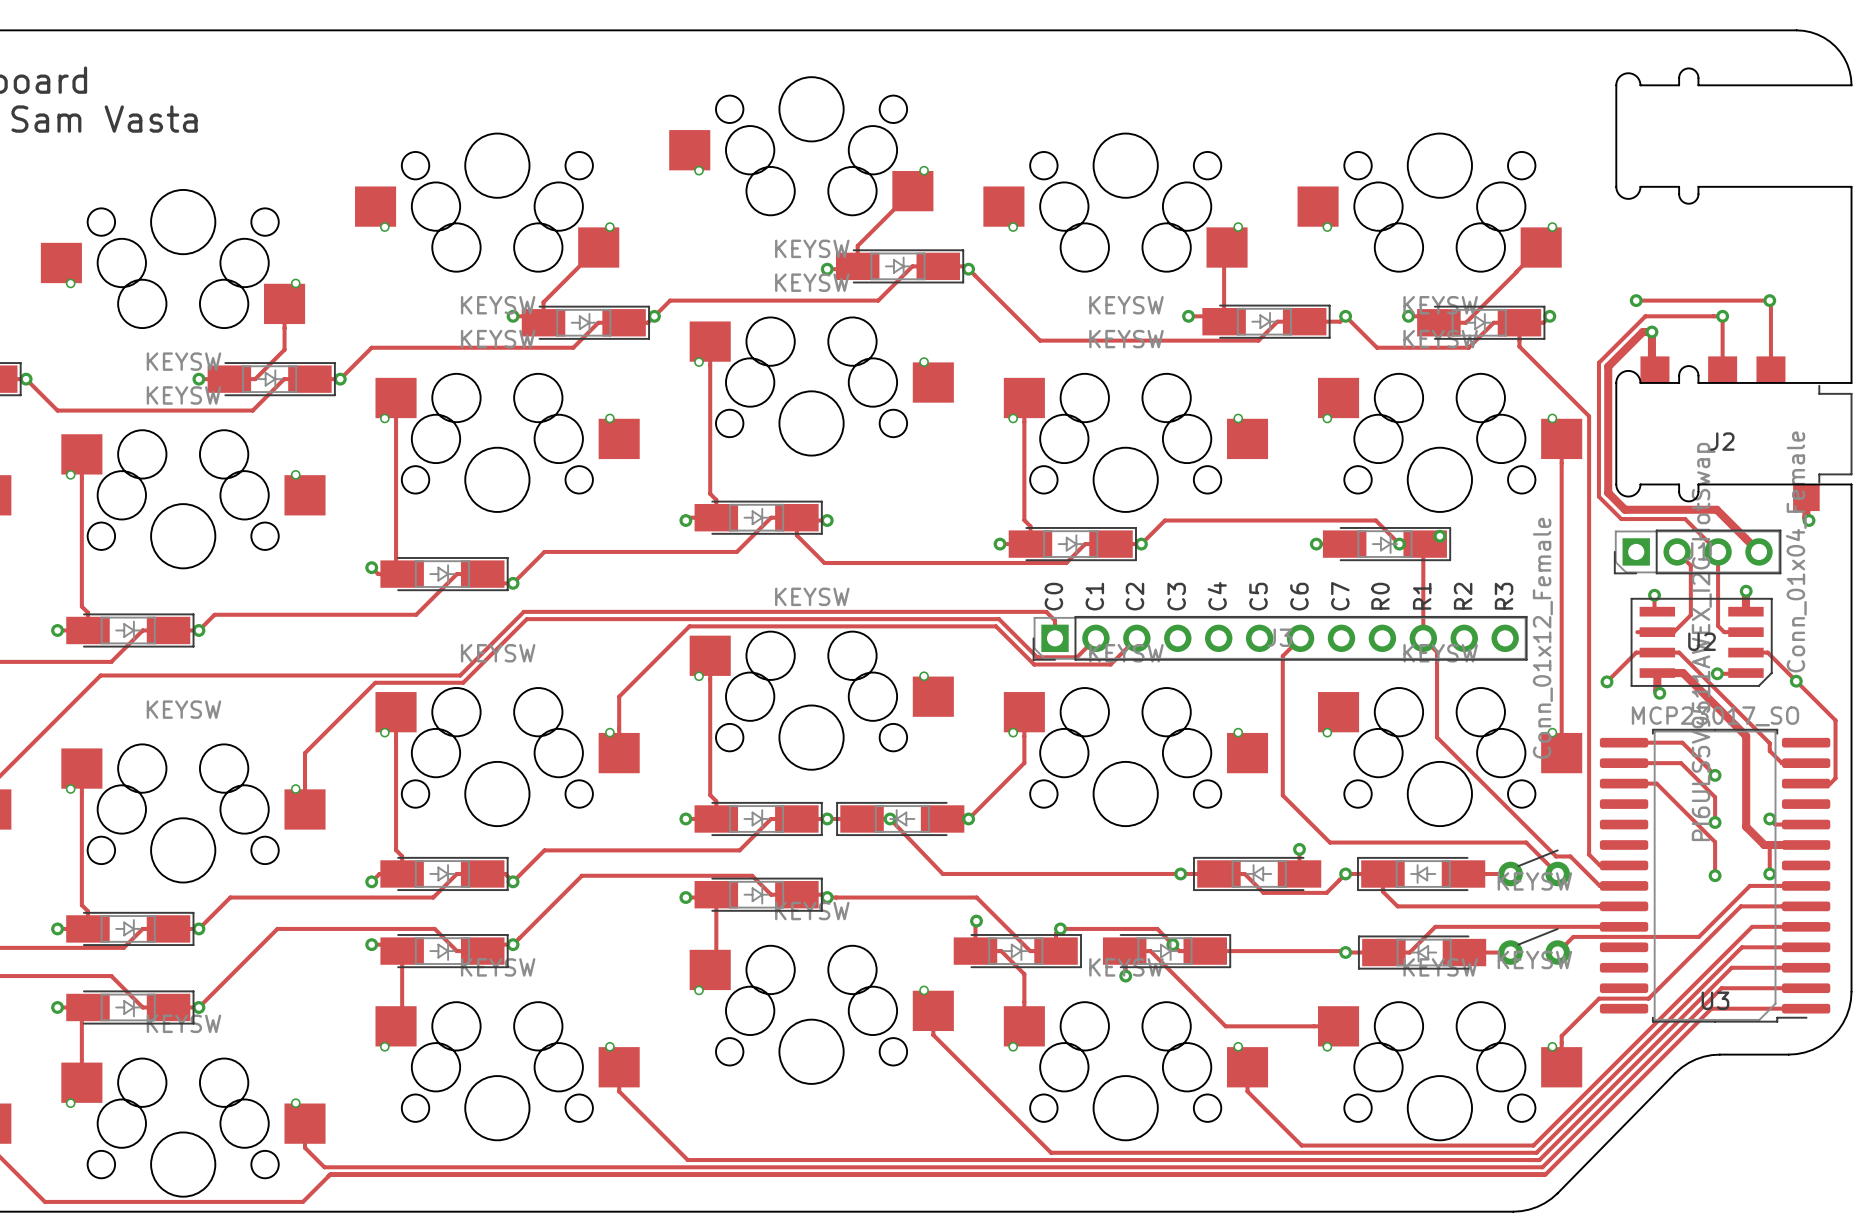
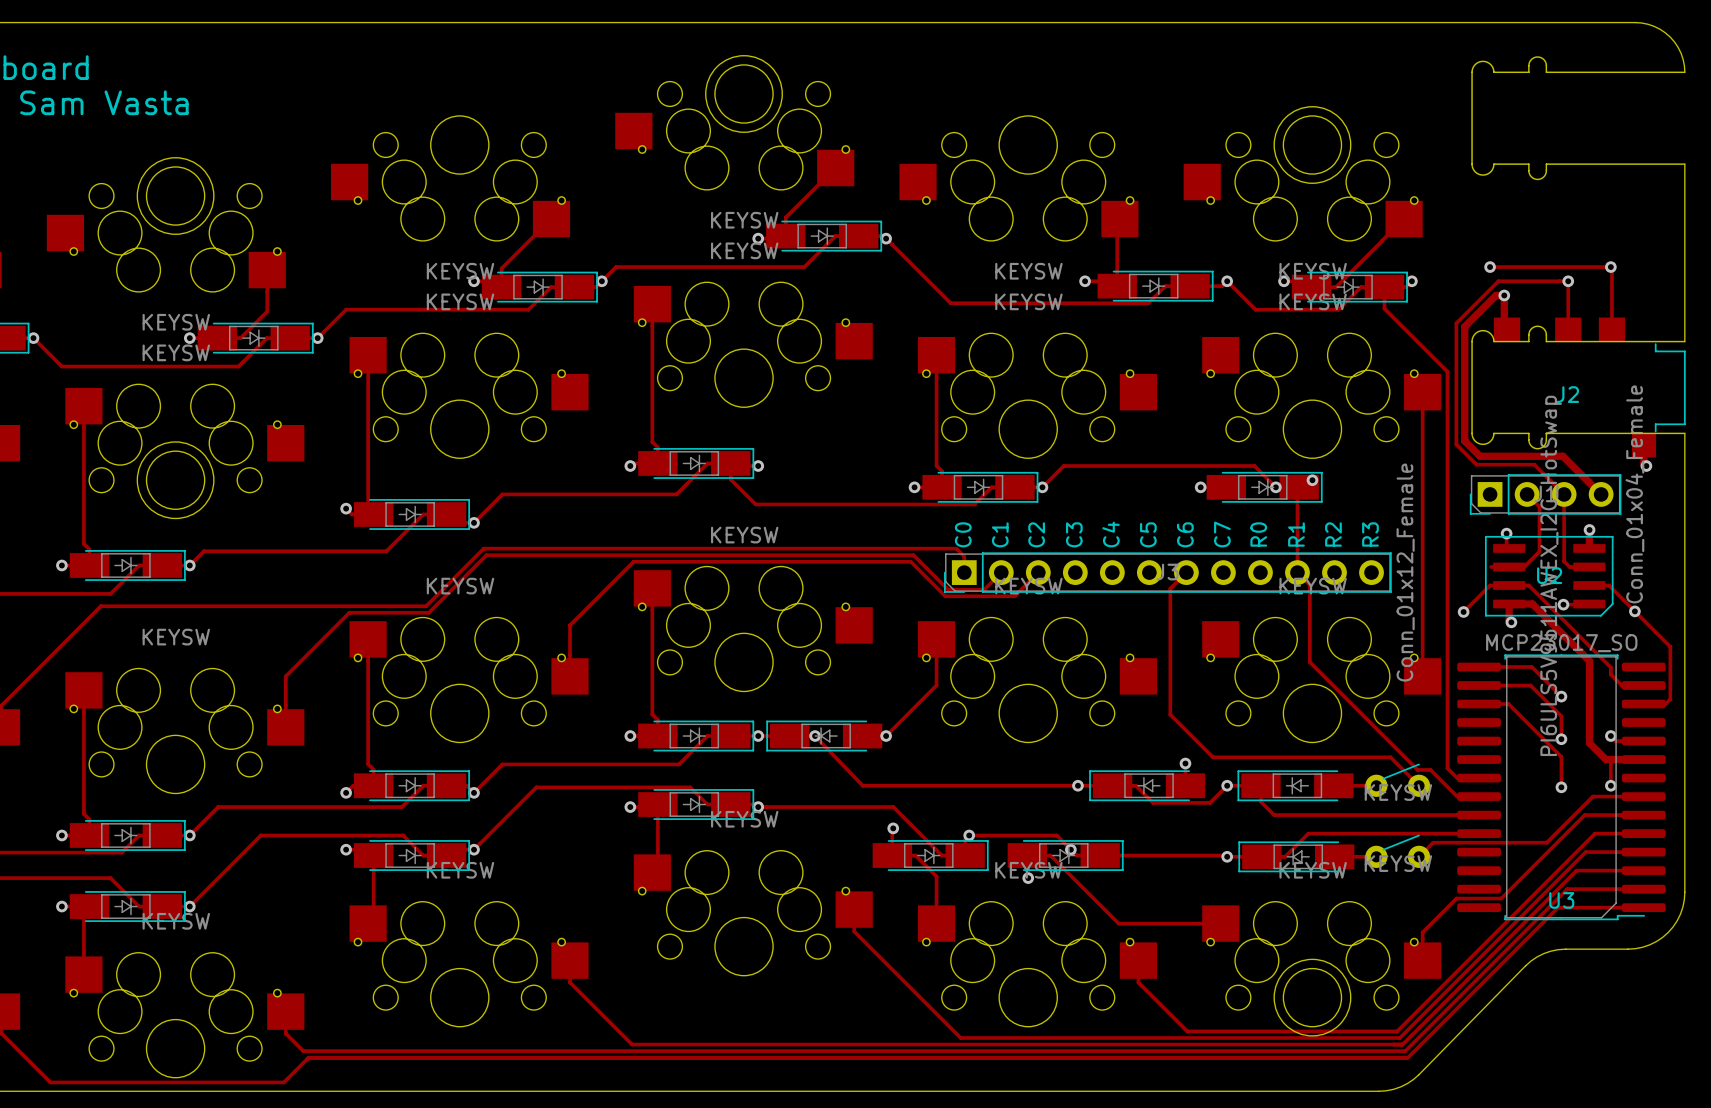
round board edge: none -> [705, 55, 783, 133]
round board edge: none -> [1273, 106, 1352, 184]
round board edge: none -> [136, 157, 215, 235]
round board edge: none -> [136, 441, 215, 519]
round board edge: none -> [1273, 959, 1352, 1037]

